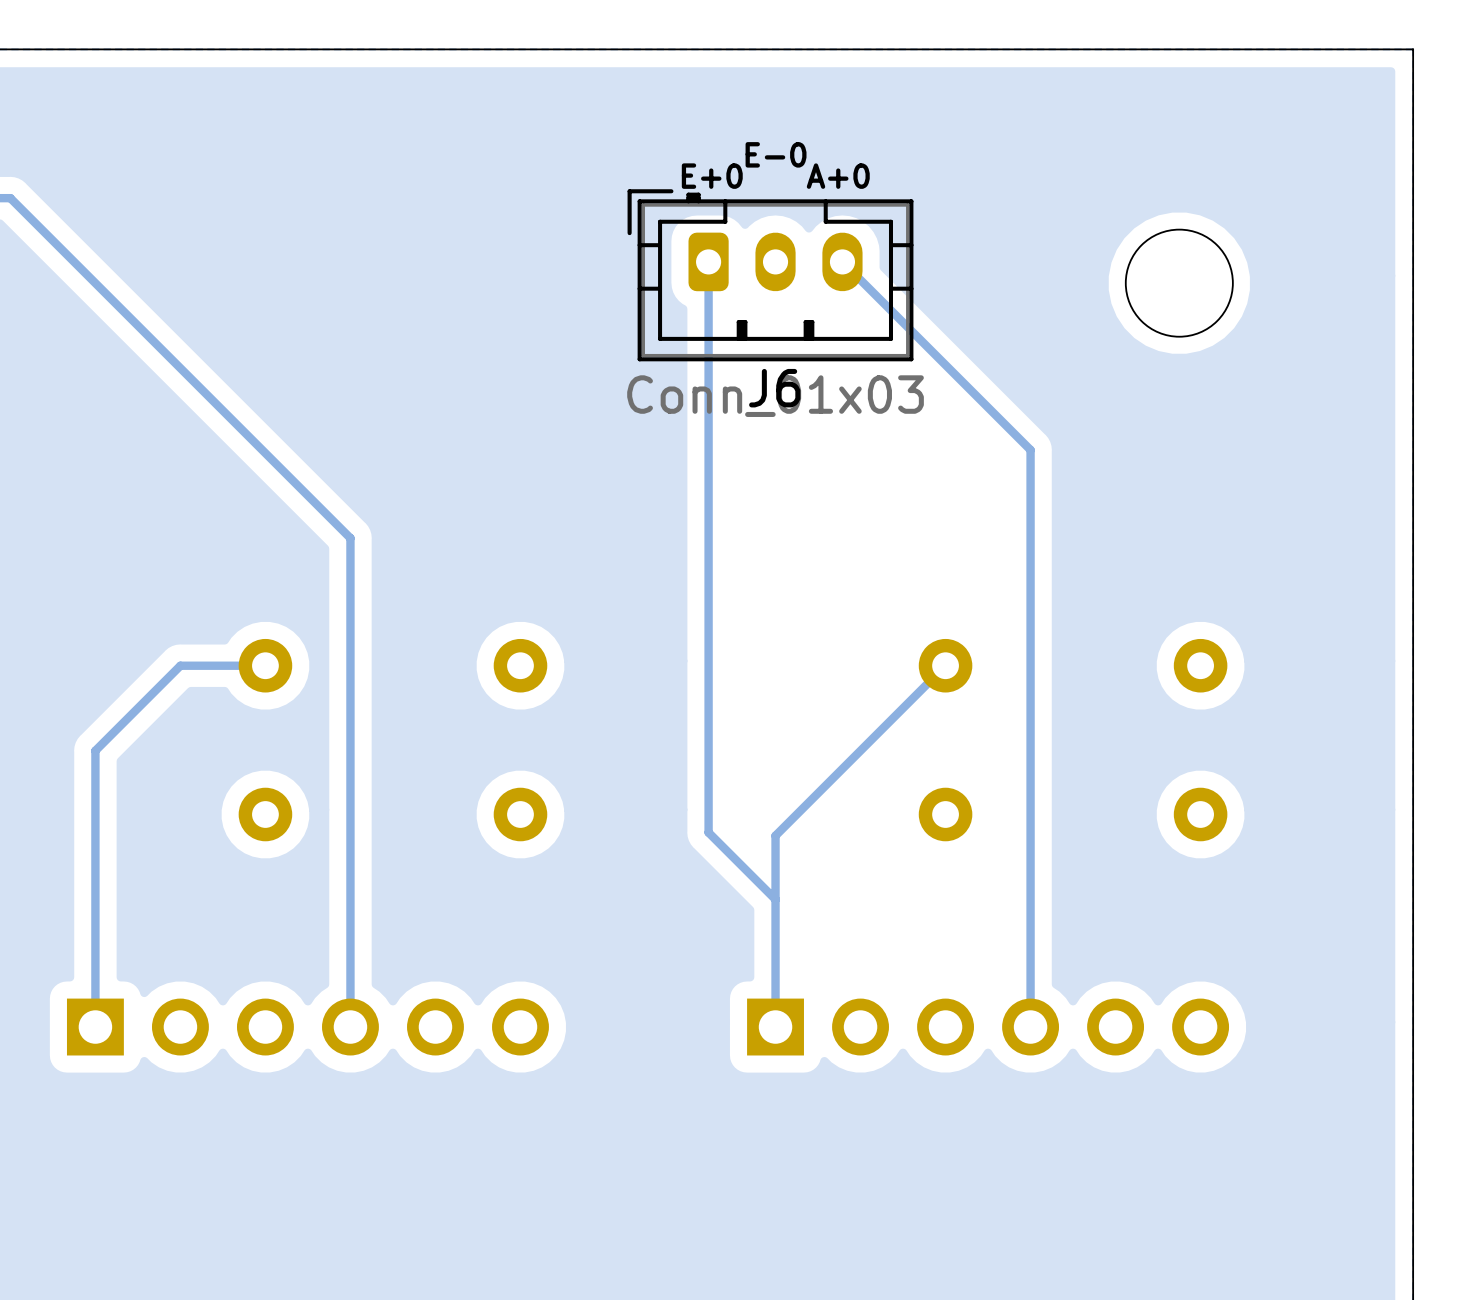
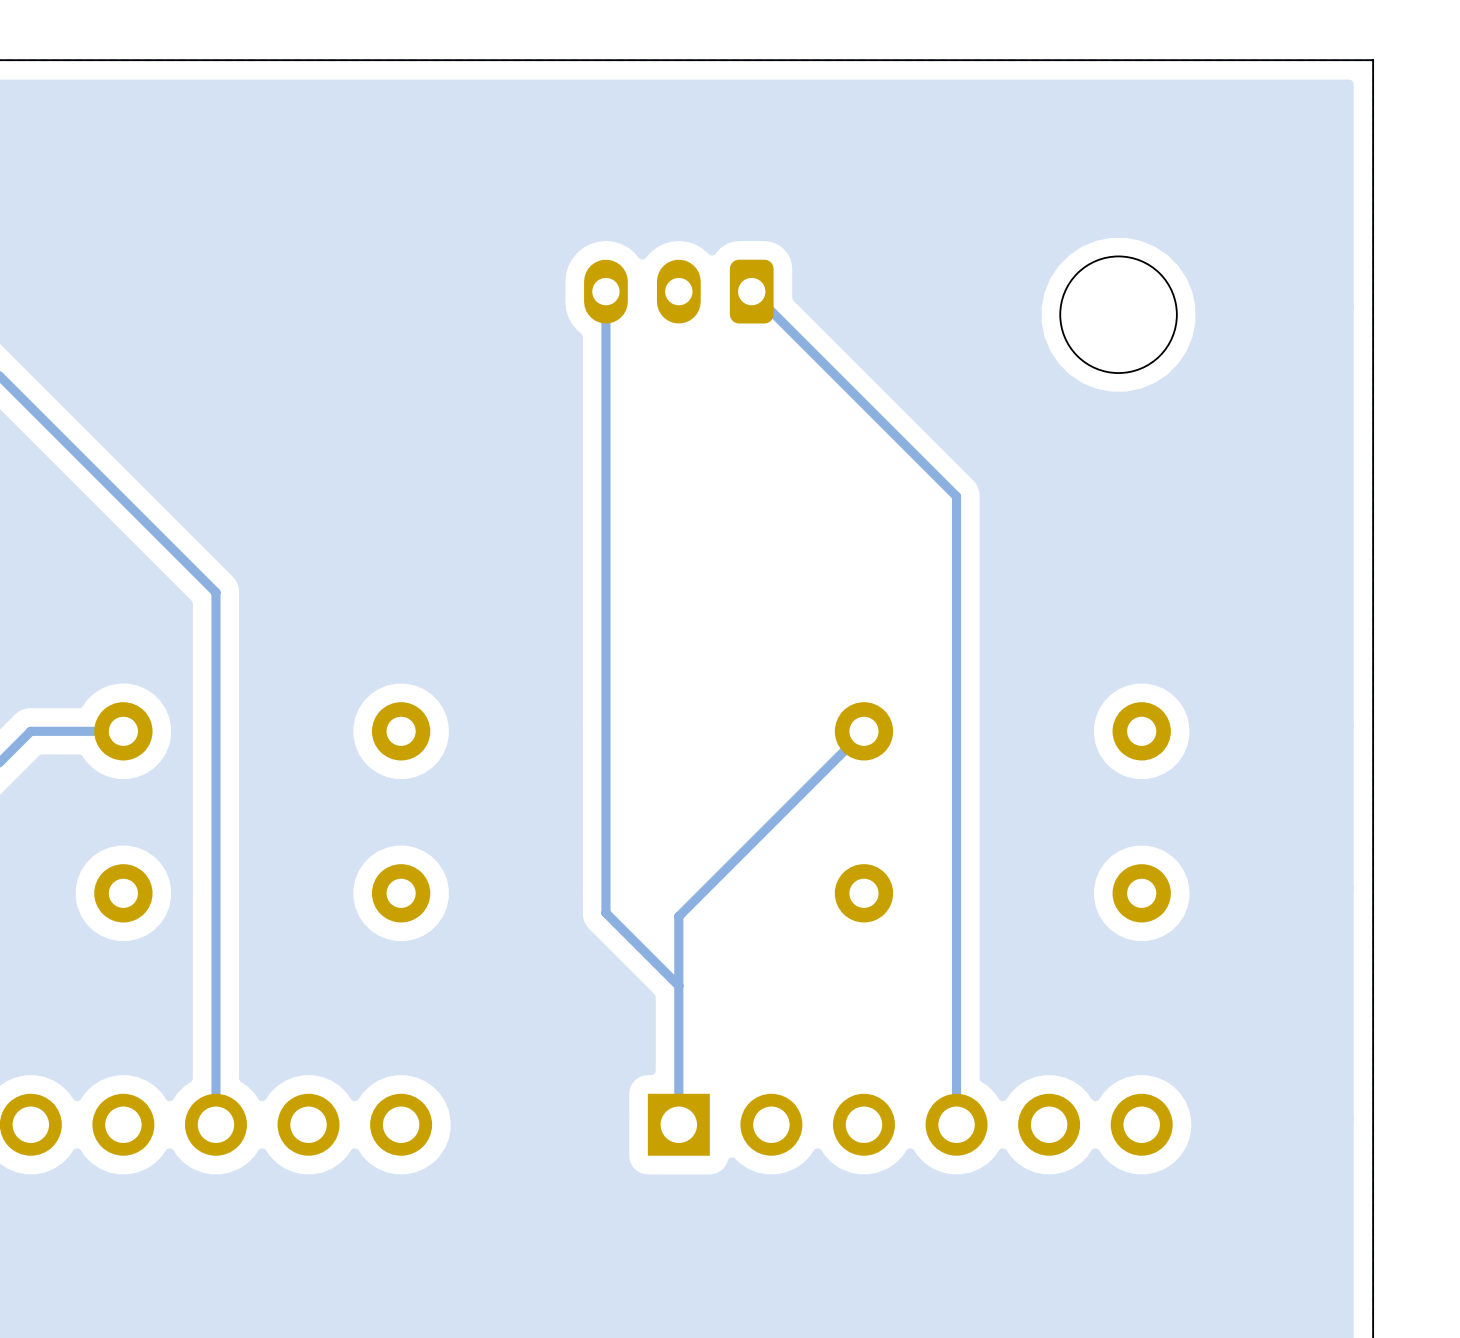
text: E-0 (776, 154) -> none
text: E+0 (712, 176) -> none
text: A+0 (838, 176) -> none
J6 side: bottom (770, 275) -> top (678, 291)

